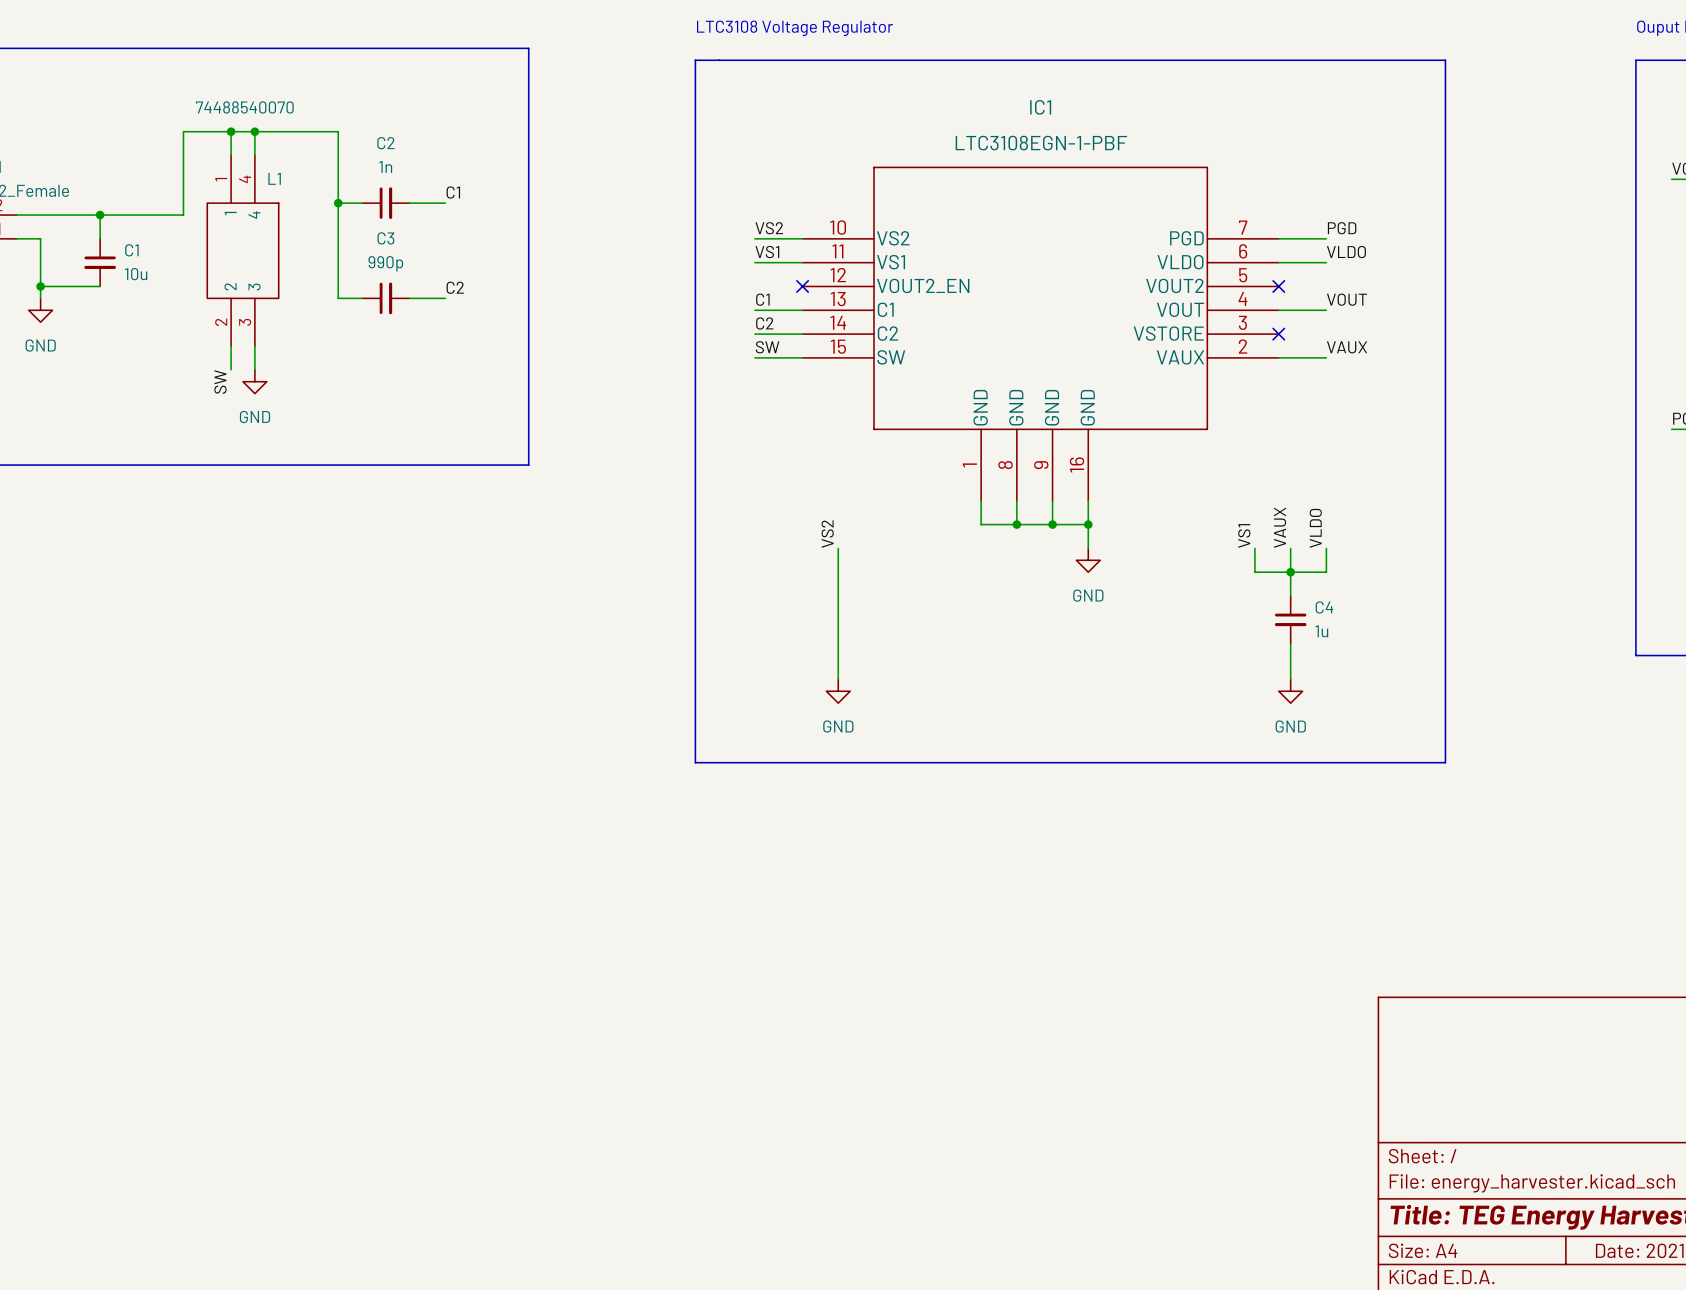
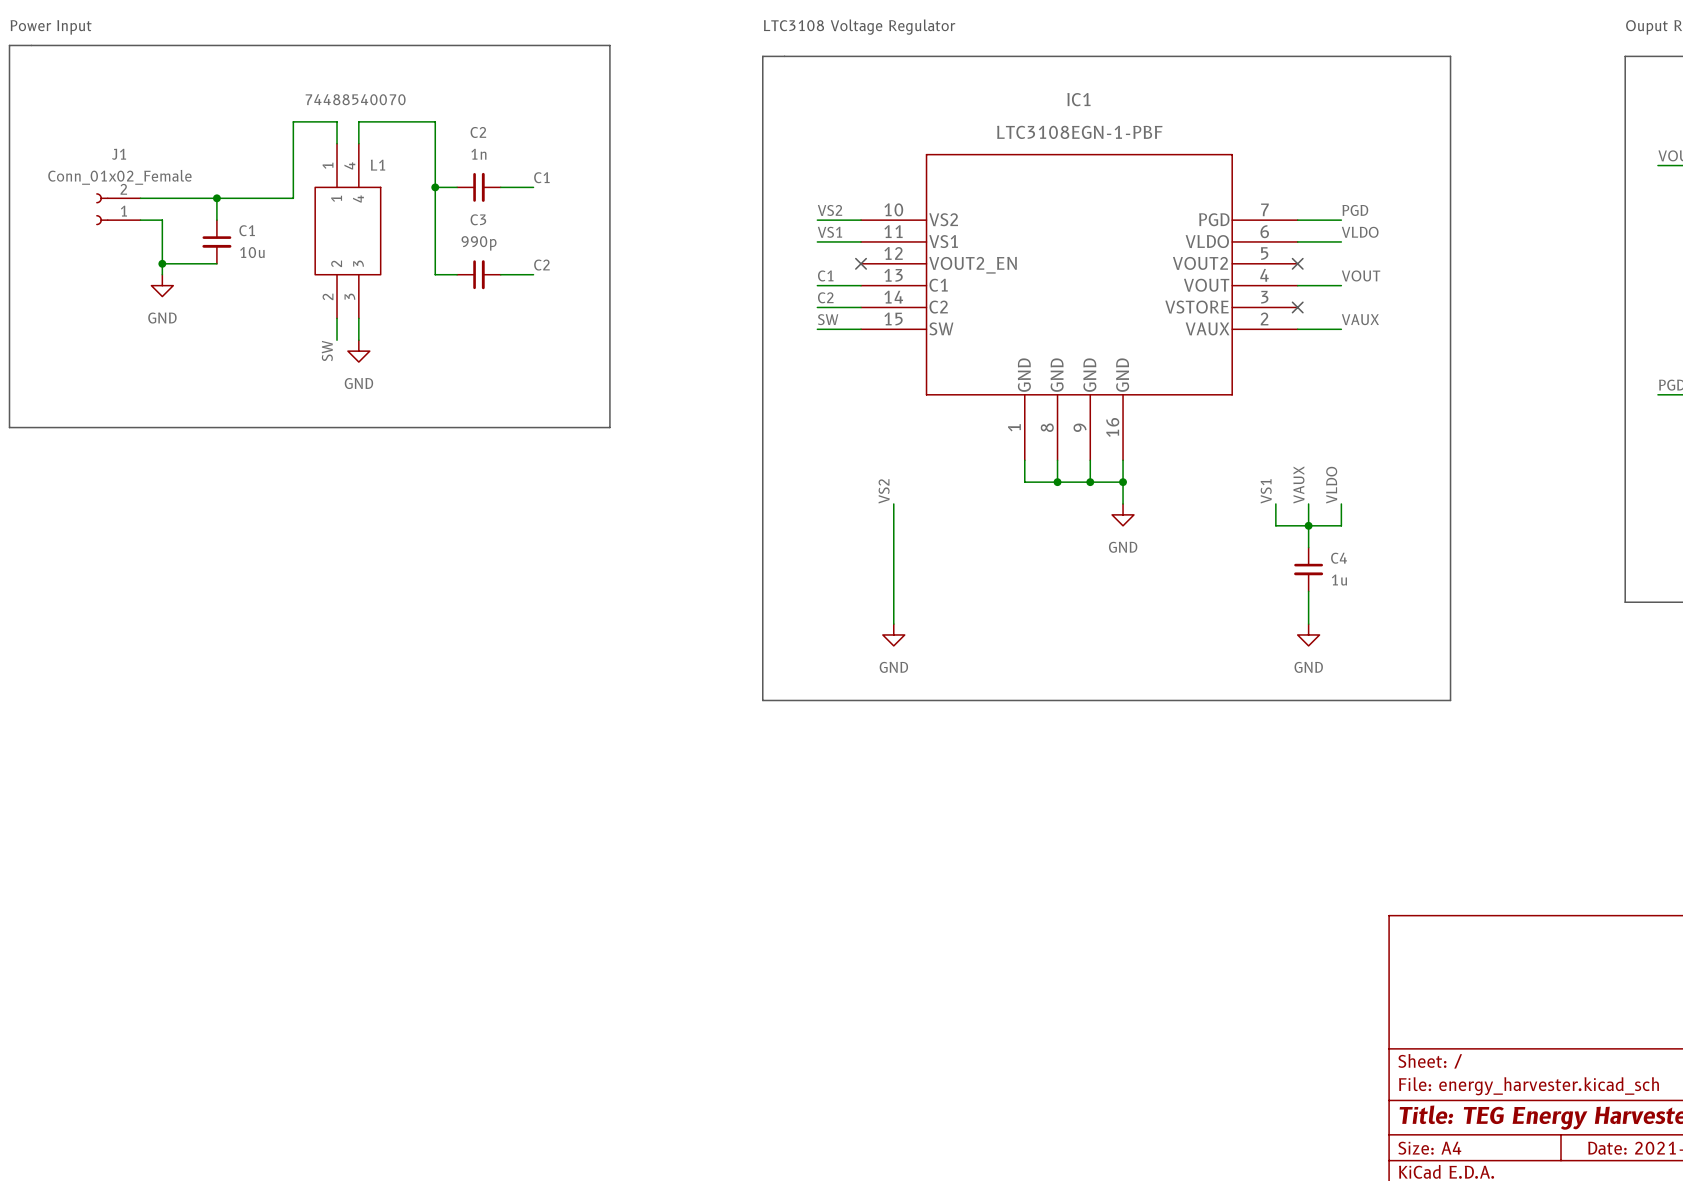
wire: (231, 131) (254, 131) -> none
junction: (231, 131) -> none
junction: (254, 131) -> none

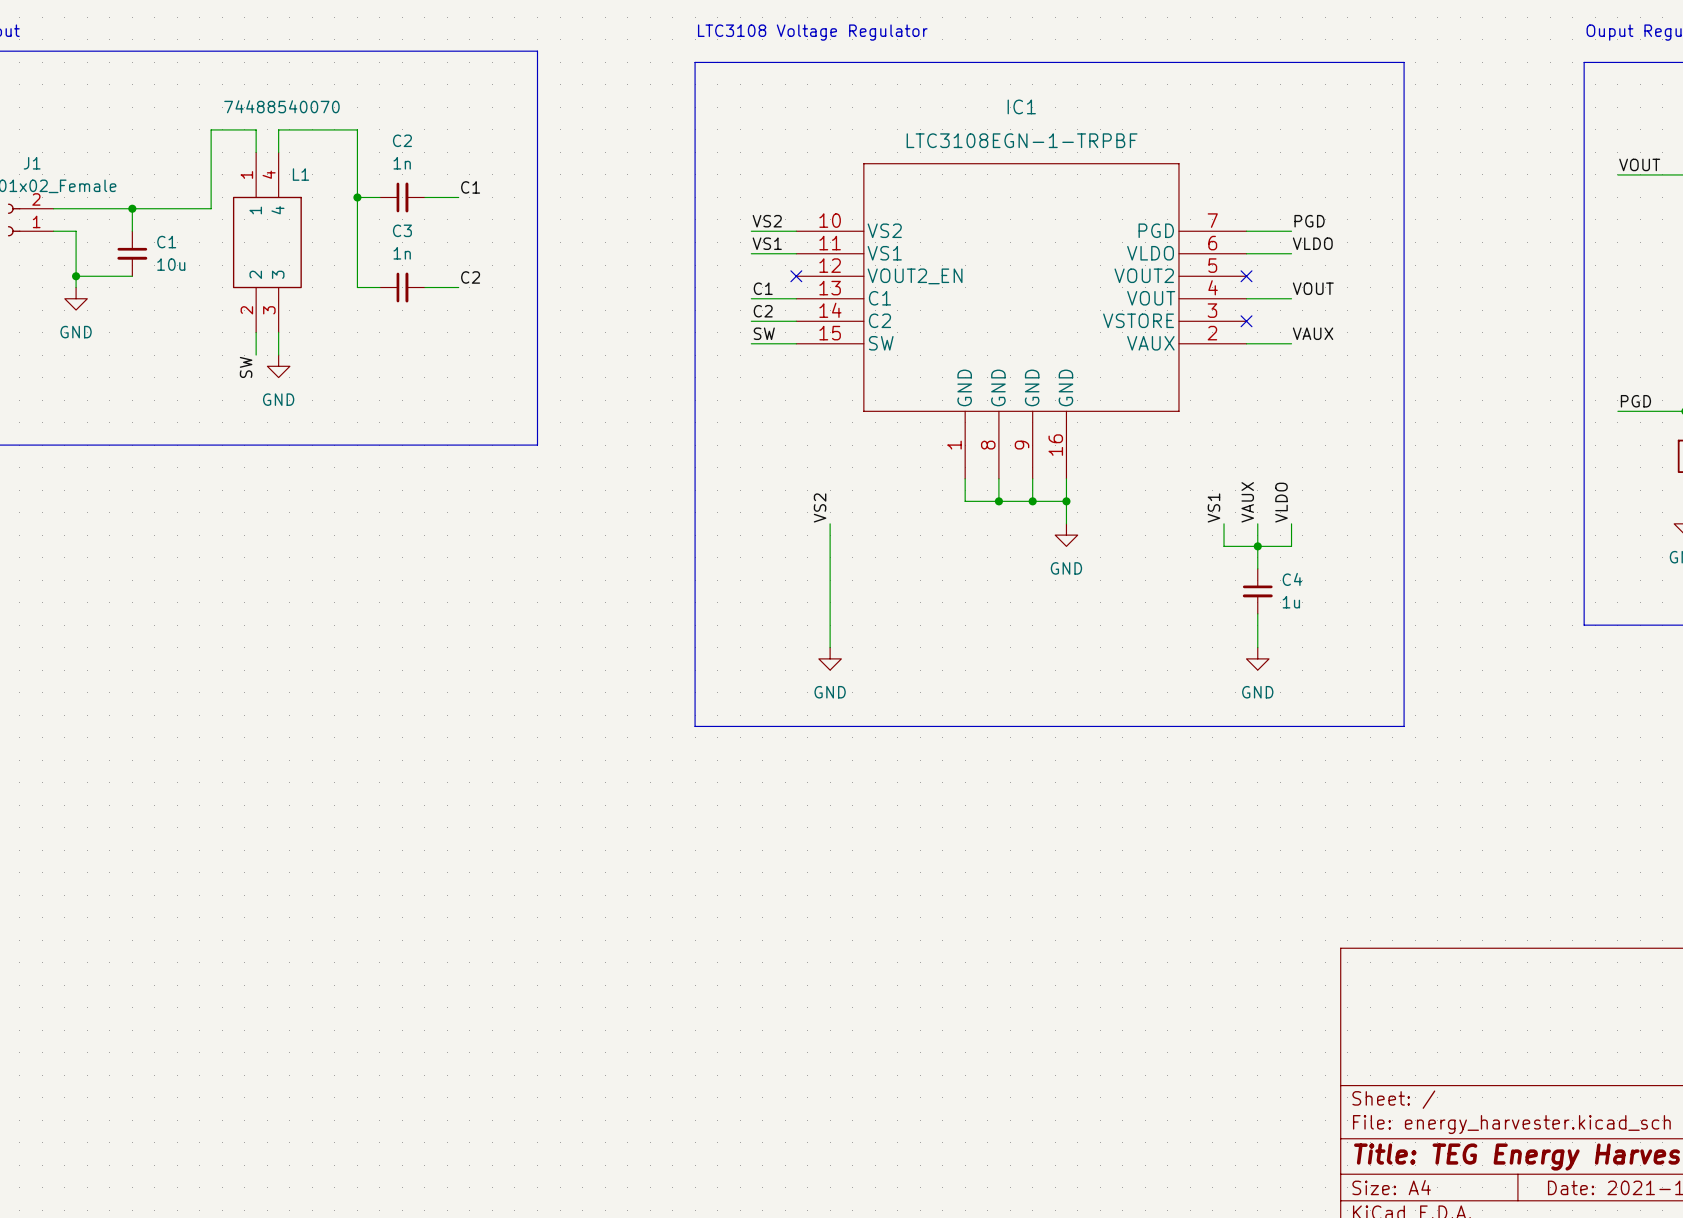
IC1 value: LTC3108EGN-1-PBF (1079, 132) -> LTC3108EGN-1-TRPBF (1022, 140)
C3 value: 990p (479, 243) -> 1n (402, 253)

